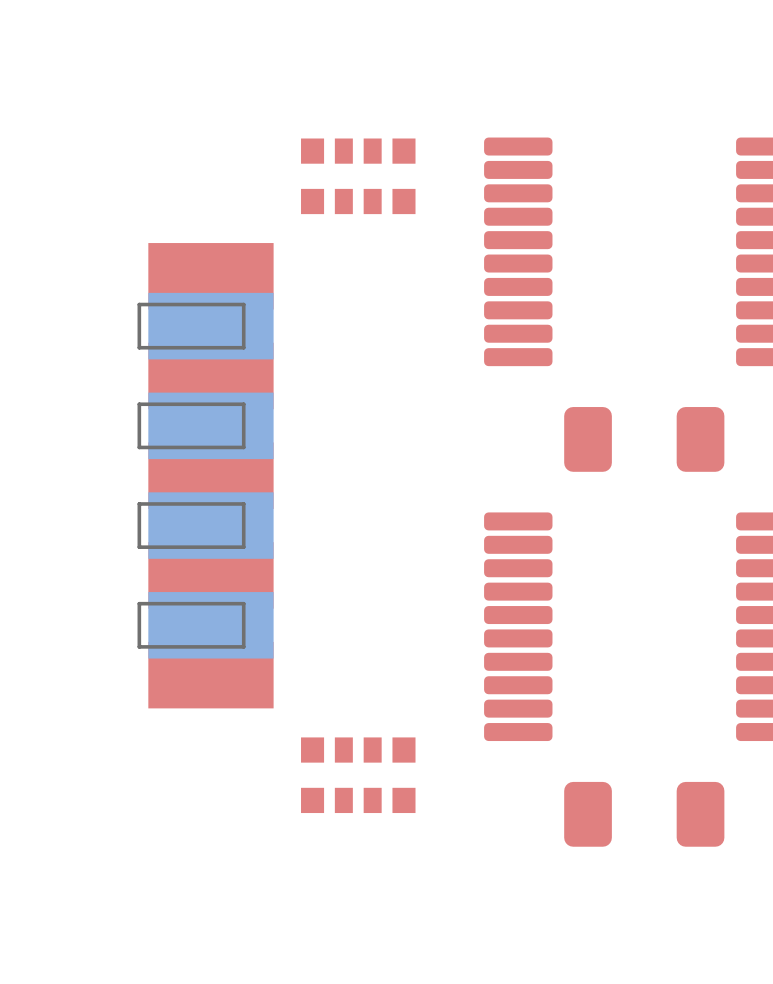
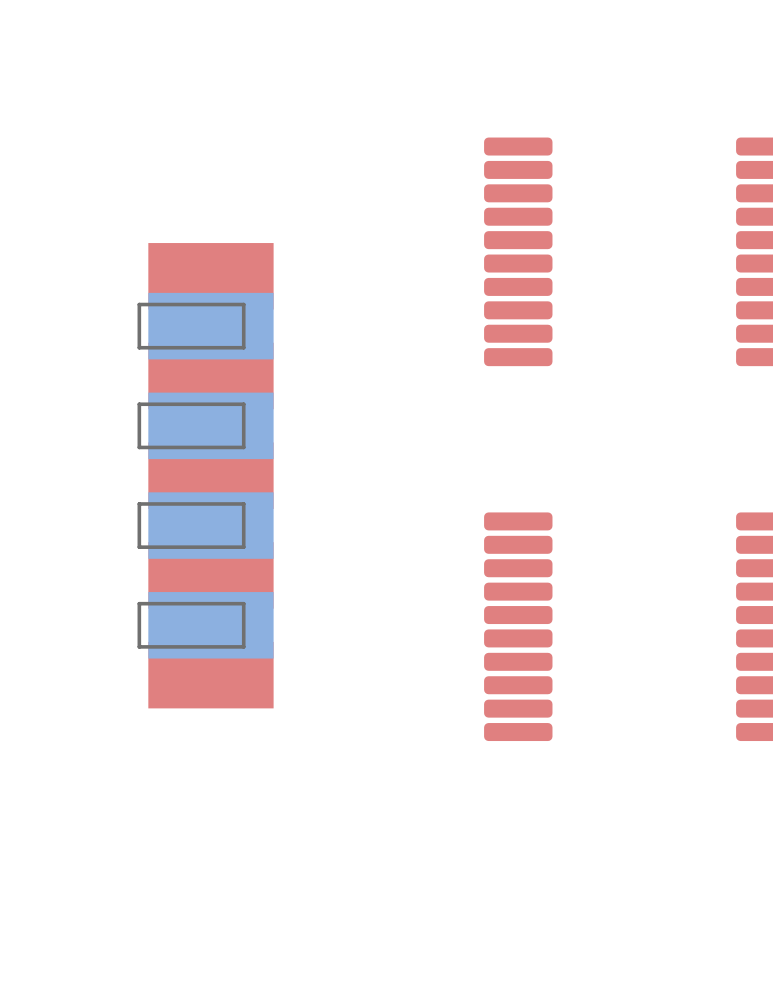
part: (358, 176) -> none
part: (644, 439) -> none
part: (358, 775) -> none
part: (644, 814) -> none

